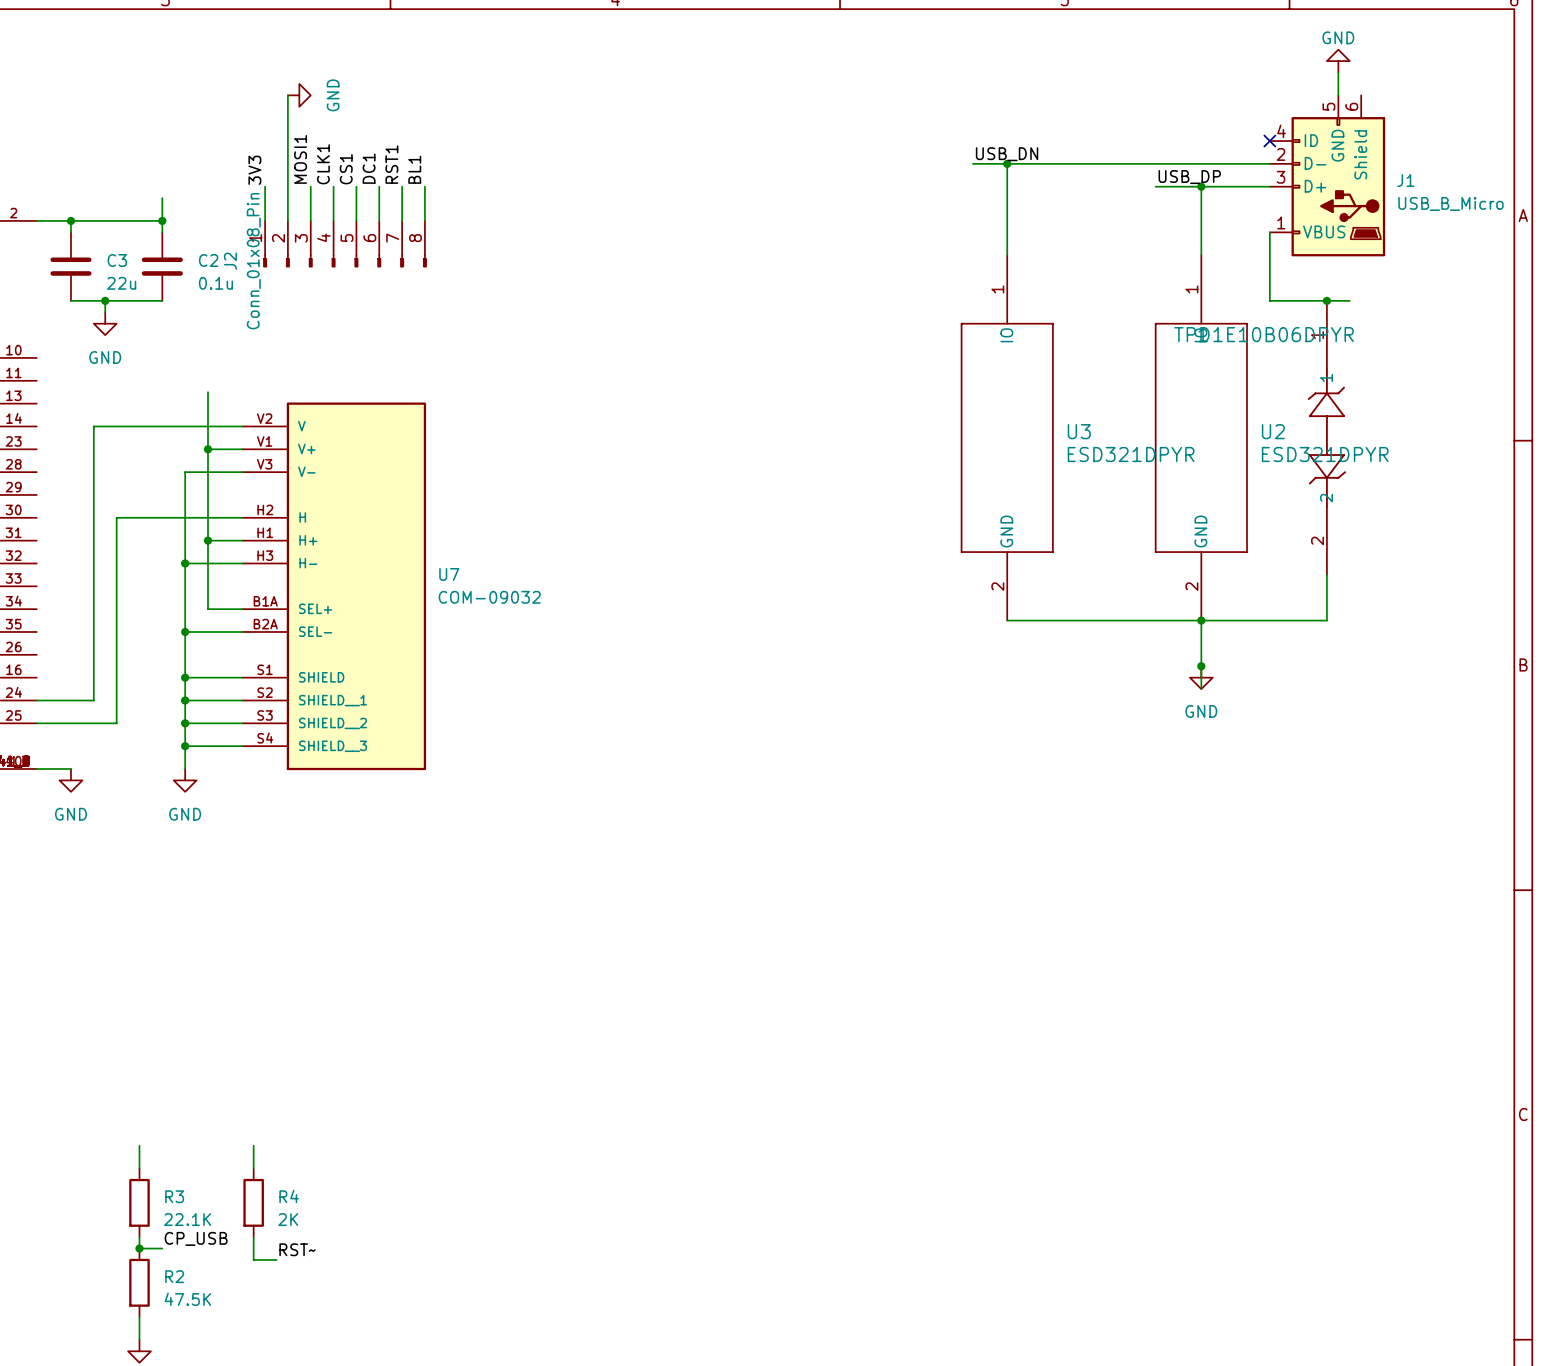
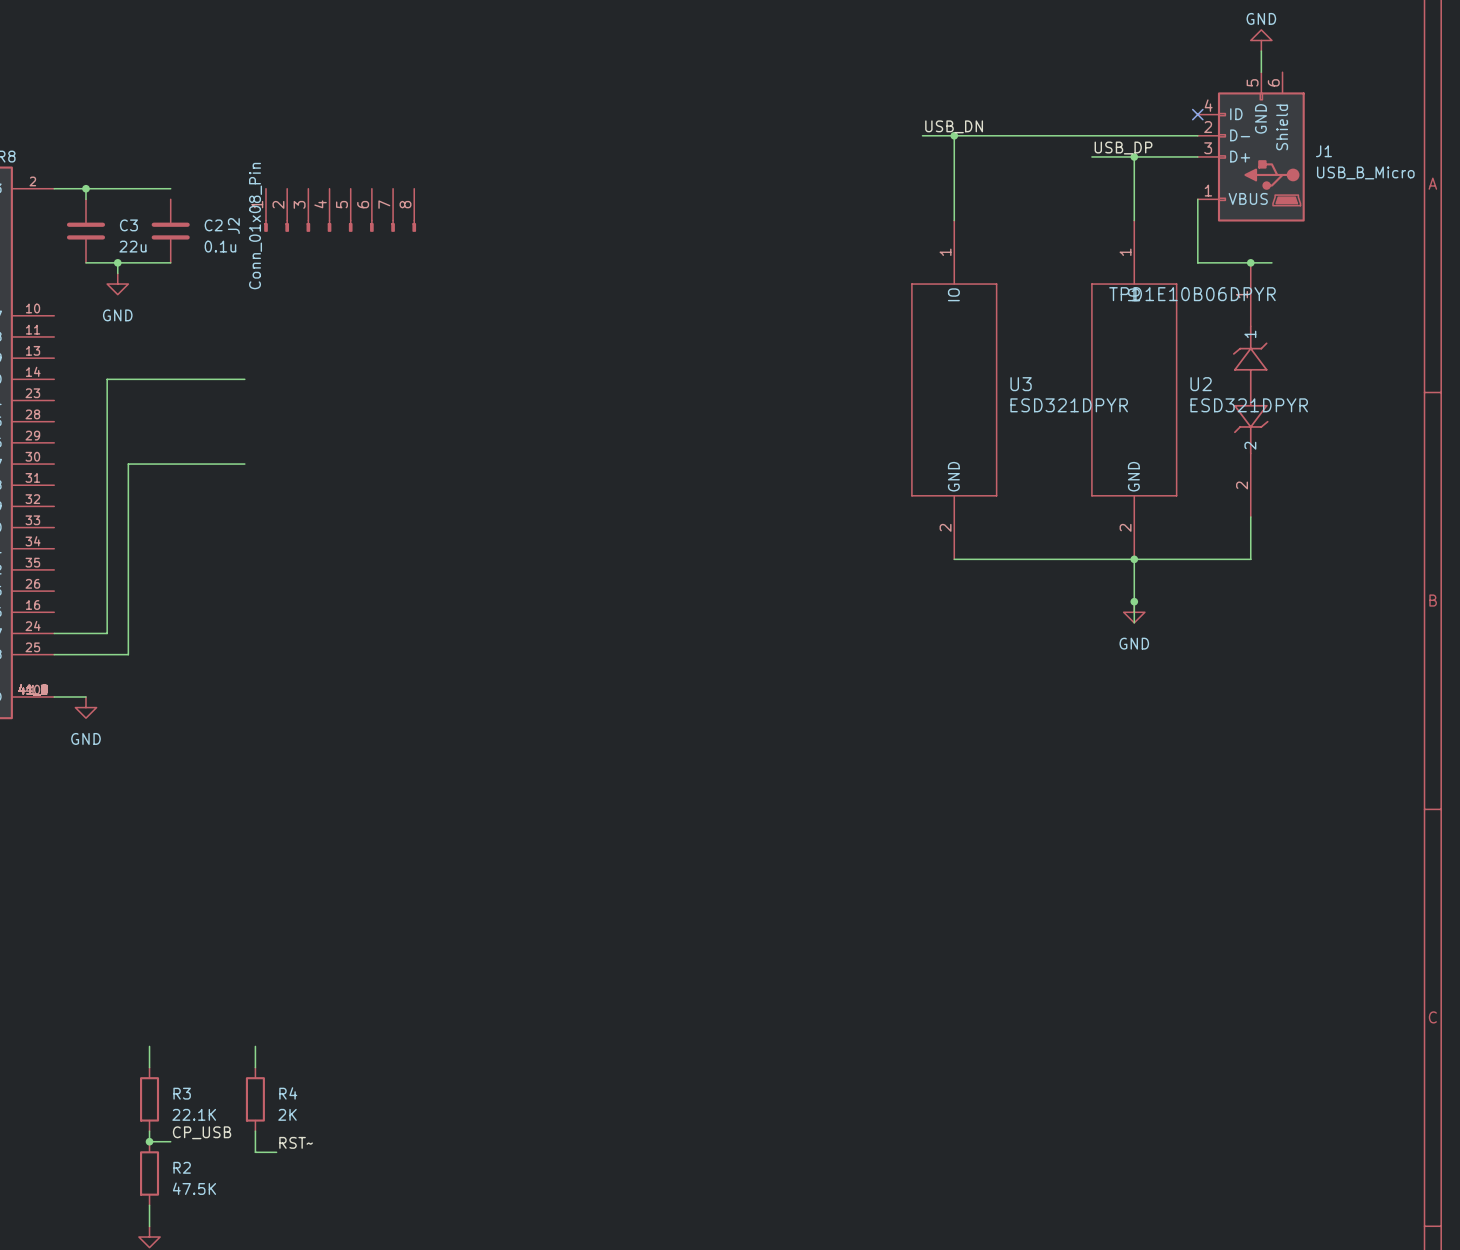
wire: (287, 95) (287, 220) -> none
power symbol: GND (299, 95) -> none
label: MOSI1 (300, 159) -> none
label: CLK1 (323, 164) -> none
label: RST1 (391, 164) -> none
label: DC1 (369, 168) -> none
label: CS1 (346, 169) -> none
label: BL1 (414, 169) -> none
label: 3V3 (254, 170) -> none
wire: (265, 186) (265, 220) -> none
wire: (310, 186) (310, 220) -> none
wire: (333, 186) (333, 220) -> none
wire: (356, 186) (356, 220) -> none
wire: (379, 186) (379, 220) -> none
wire: (402, 186) (402, 220) -> none
wire: (424, 186) (424, 220) -> none
wire: (162, 198) (162, 232) -> none
junction: (162, 220) -> none
wire: (207, 392) (207, 609) (242, 609) -> none
wire: (207, 449) (242, 449) -> none
junction: (207, 449) -> none
wire: (242, 472) (185, 472) (185, 769) -> none
wire: (207, 540) (242, 540) -> none
junction: (207, 540) -> none
wire: (185, 563) (242, 563) -> none
junction: (185, 563) -> none
U7: COM-09032 (334, 586) -> none
wire: (185, 631) (242, 631) -> none
junction: (185, 631) -> none
wire: (185, 677) (242, 677) -> none
junction: (185, 677) -> none
wire: (185, 700) (242, 700) -> none
junction: (185, 700) -> none
wire: (185, 723) (242, 723) -> none
junction: (185, 723) -> none
wire: (185, 746) (242, 746) -> none
junction: (185, 746) -> none
power symbol: GND (185, 780) -> none

